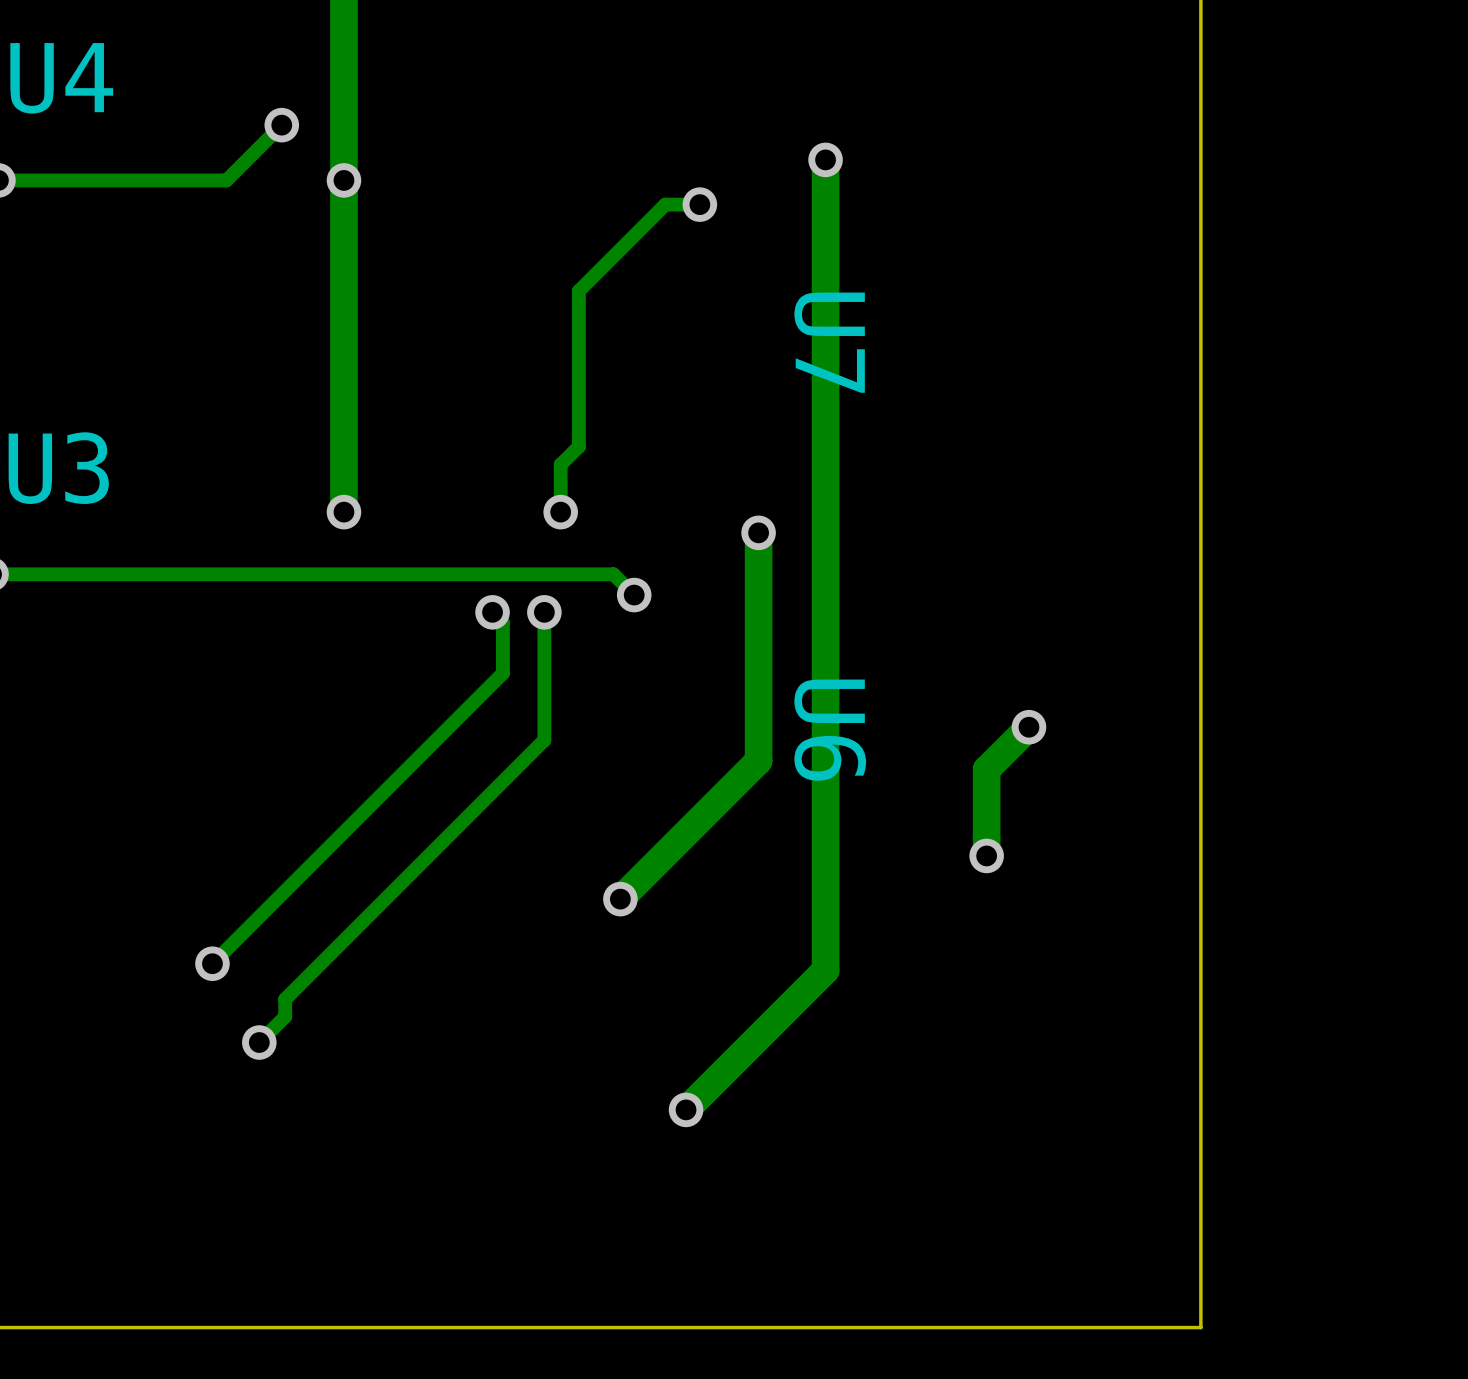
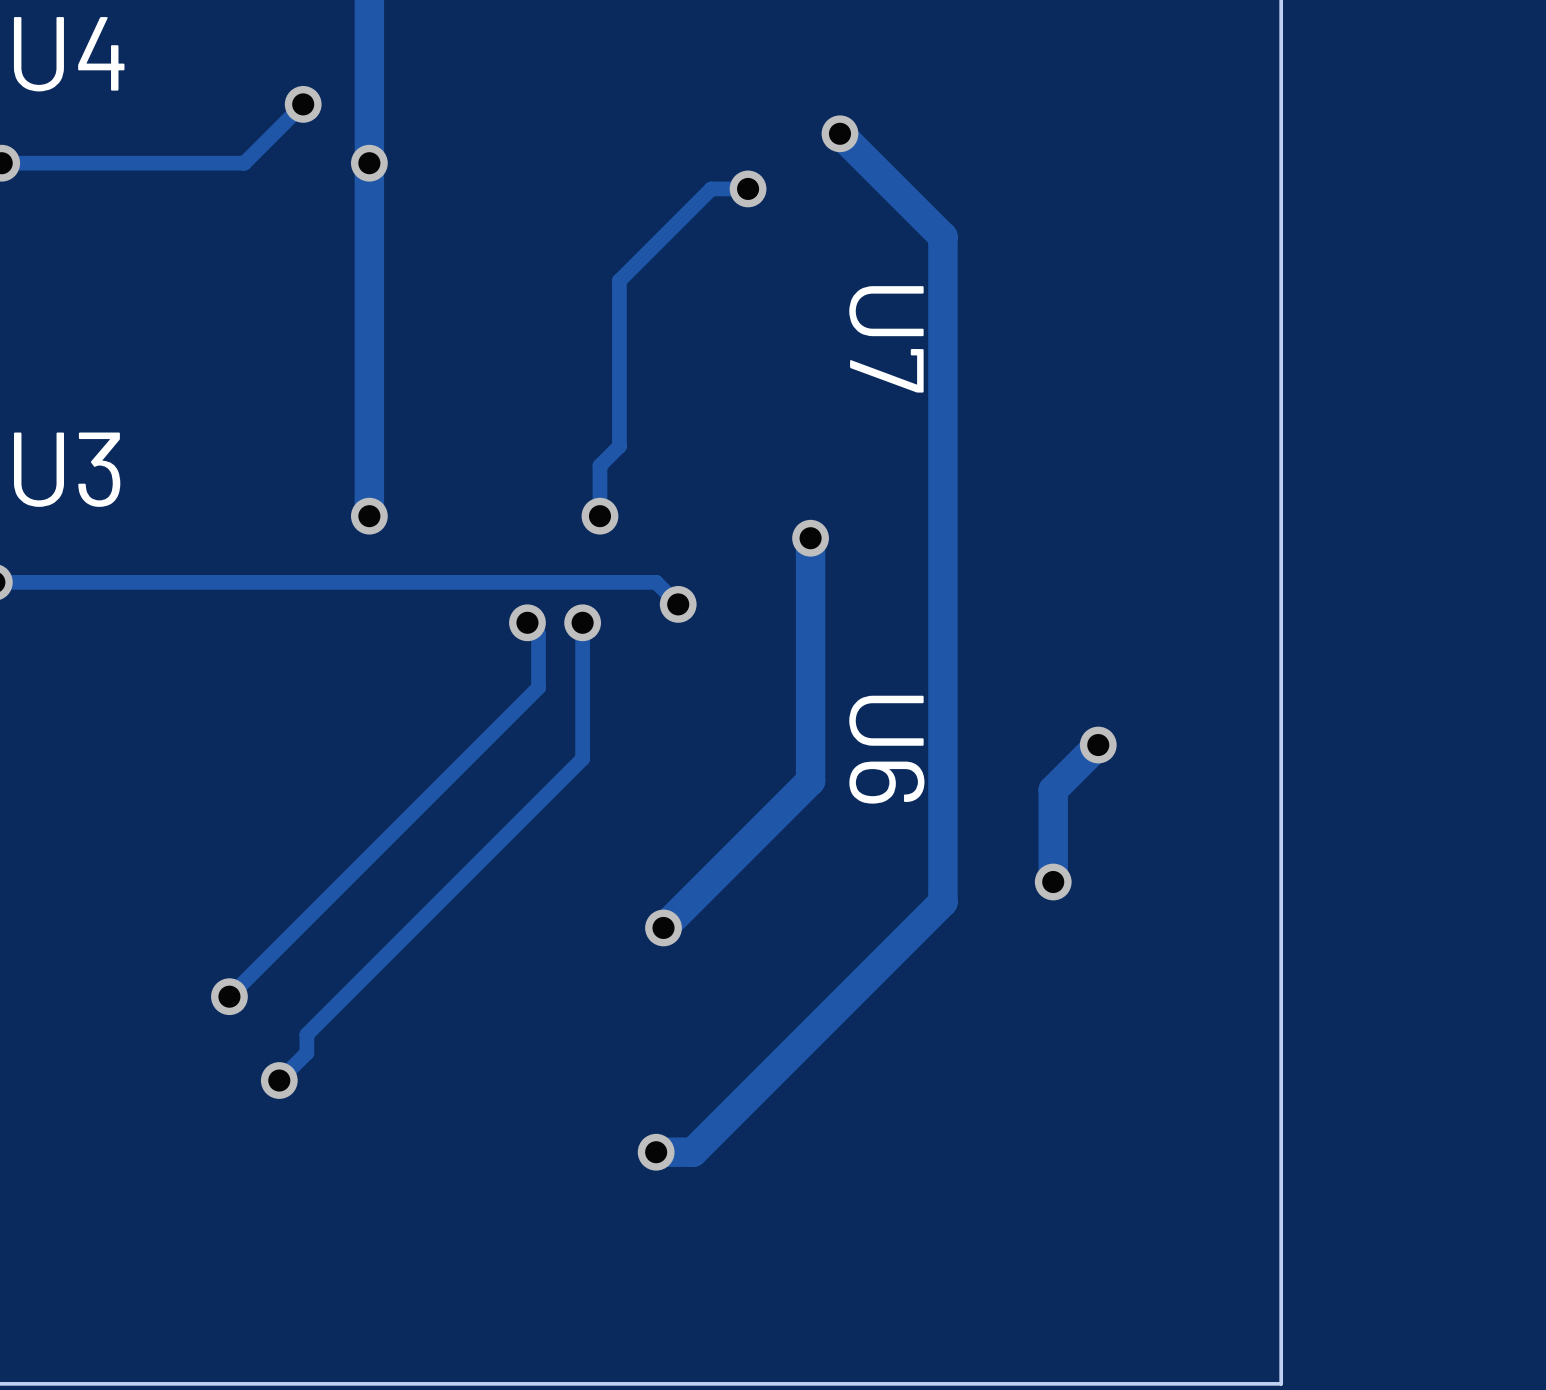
track: none -> (839, 133) (942, 236) (942, 902) (692, 1152) (656, 1152)
track: (825, 159) (825, 970) (686, 1109) -> none
via position: (825, 159) -> (839, 133)
via position: (686, 1109) -> (656, 1152)

